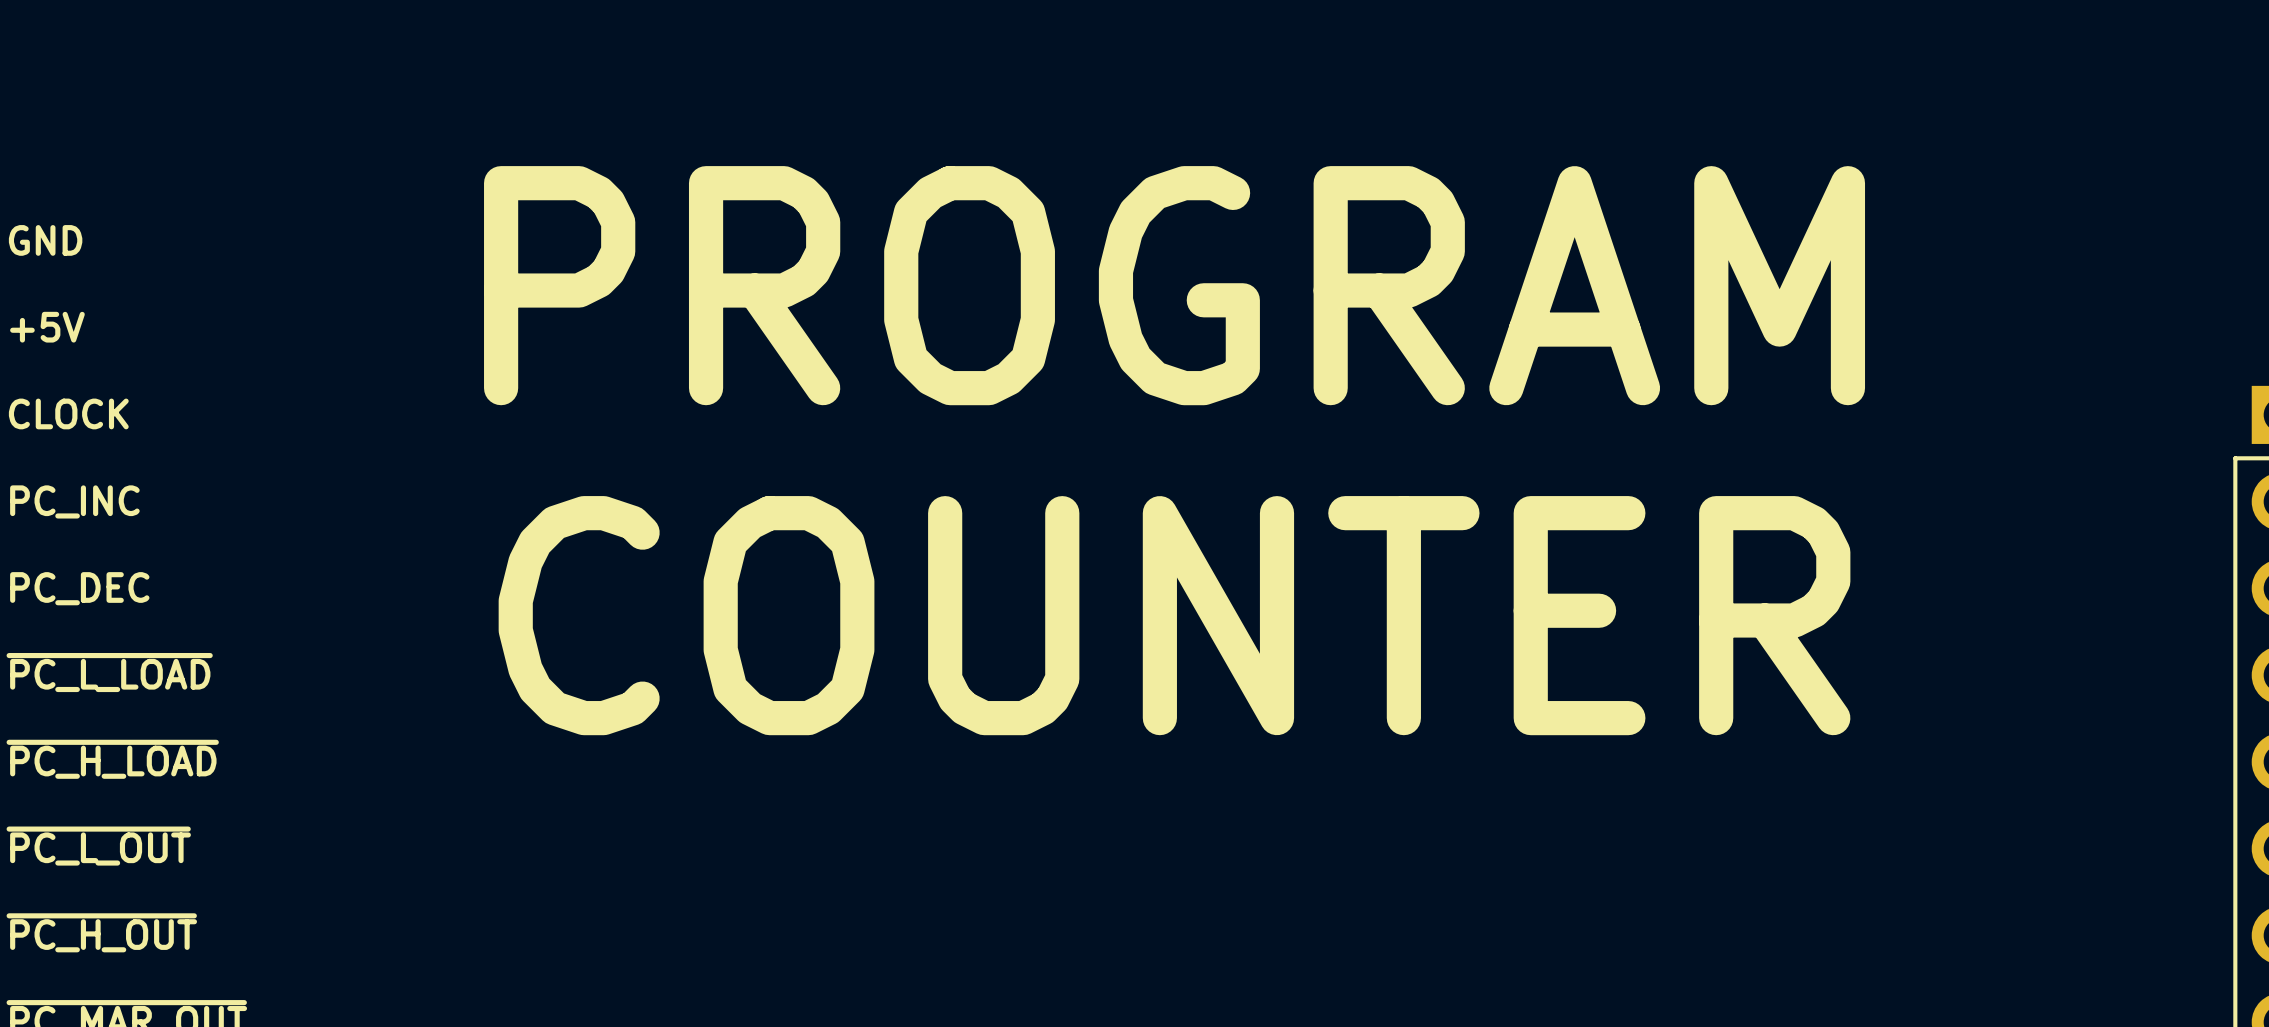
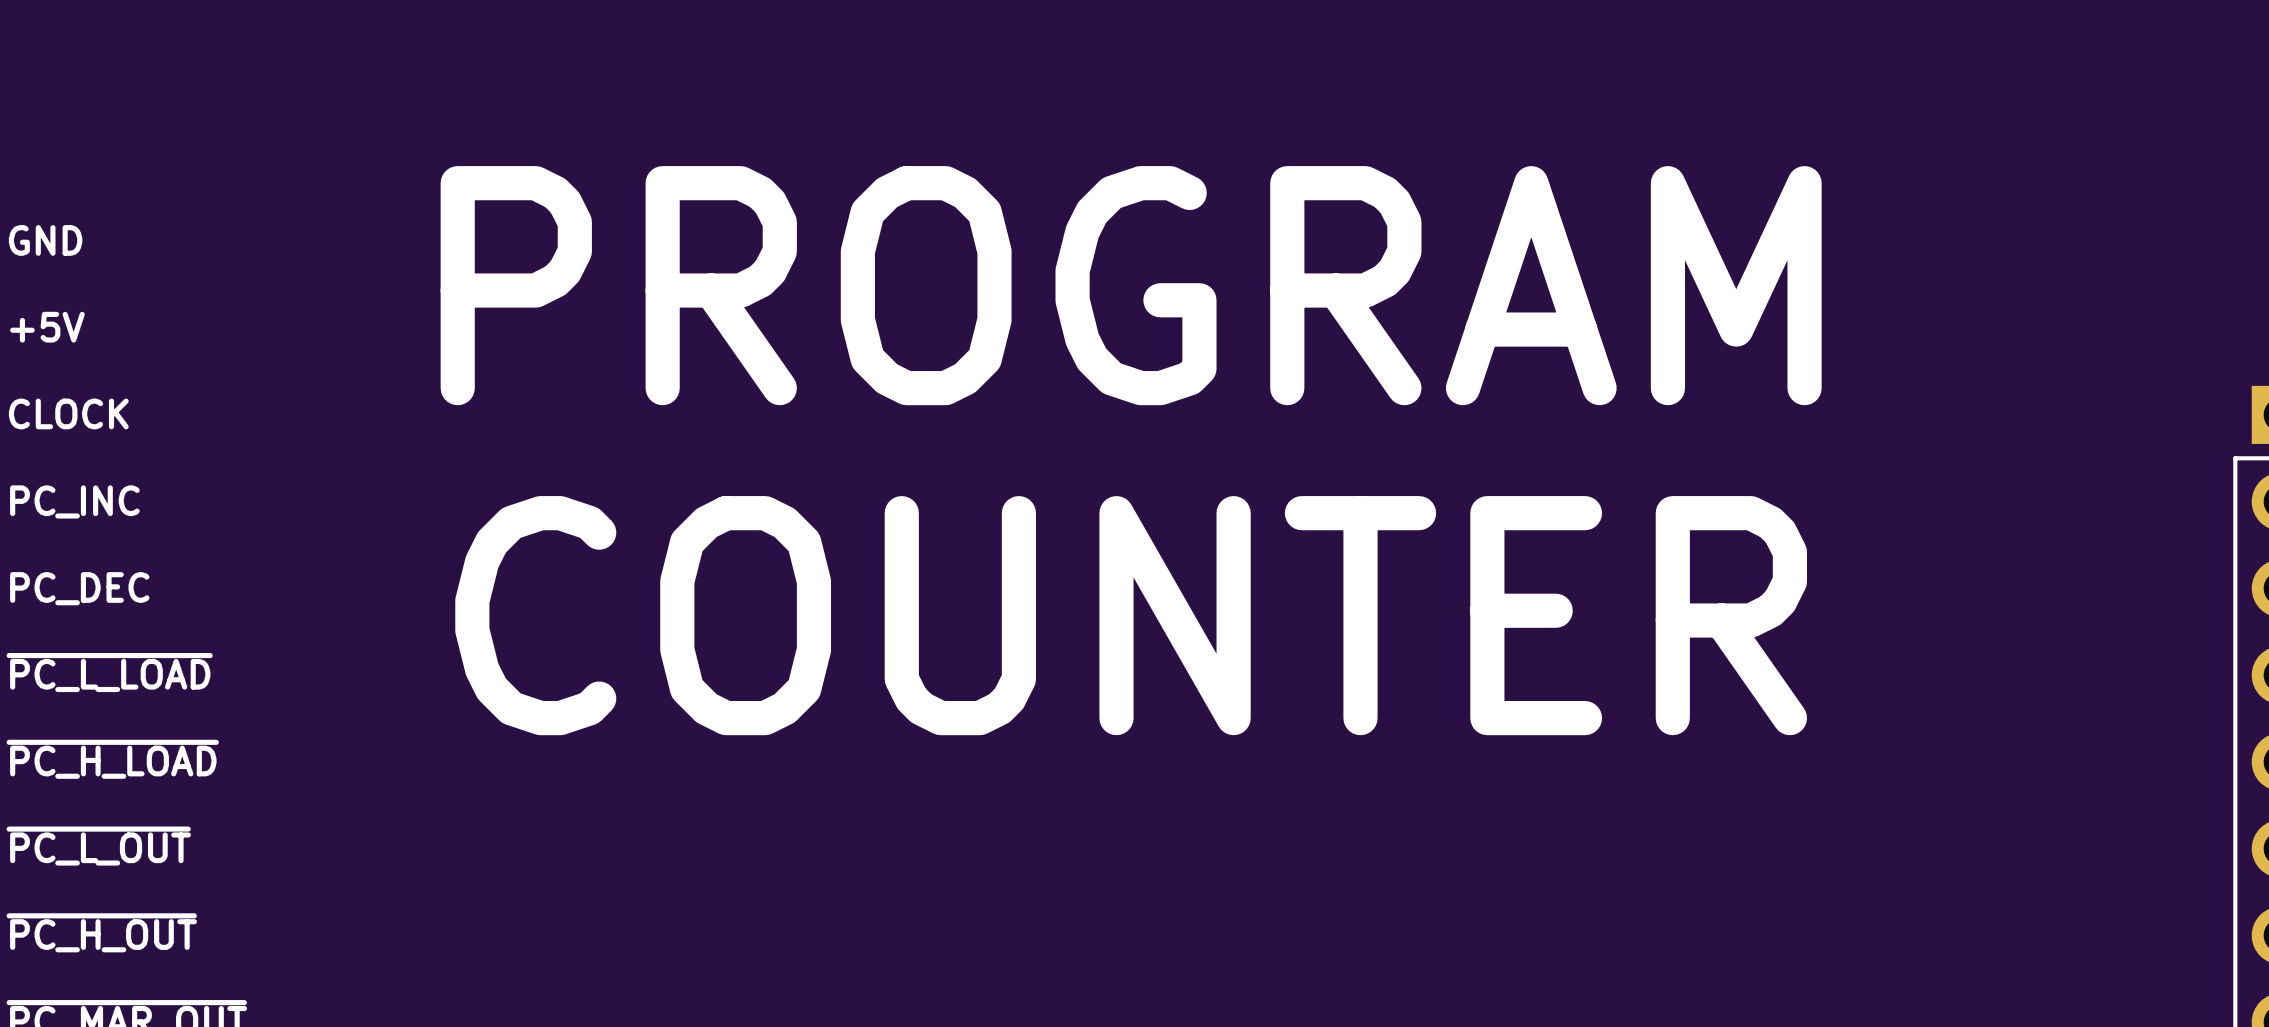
text position: PROGRAM (1174, 285) -> PROGRAM (1131, 285)
text position: COUNTER (1174, 615) -> COUNTER (1131, 615)

